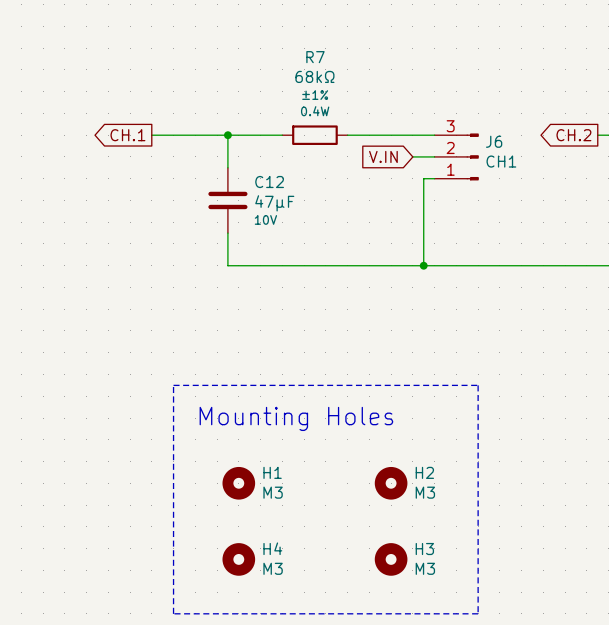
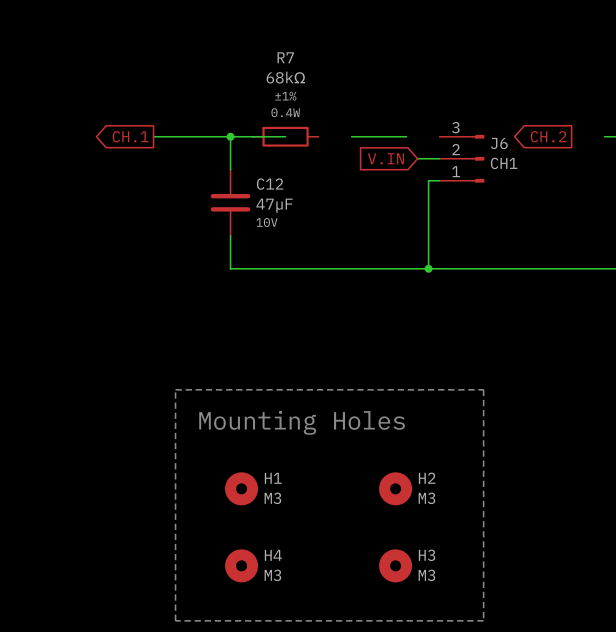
R7 position: (314, 135) -> (285, 136)
wire: (401, 135) (434, 135) -> none
global label position: CH.2 (573, 135) -> CH.2 (548, 136)

